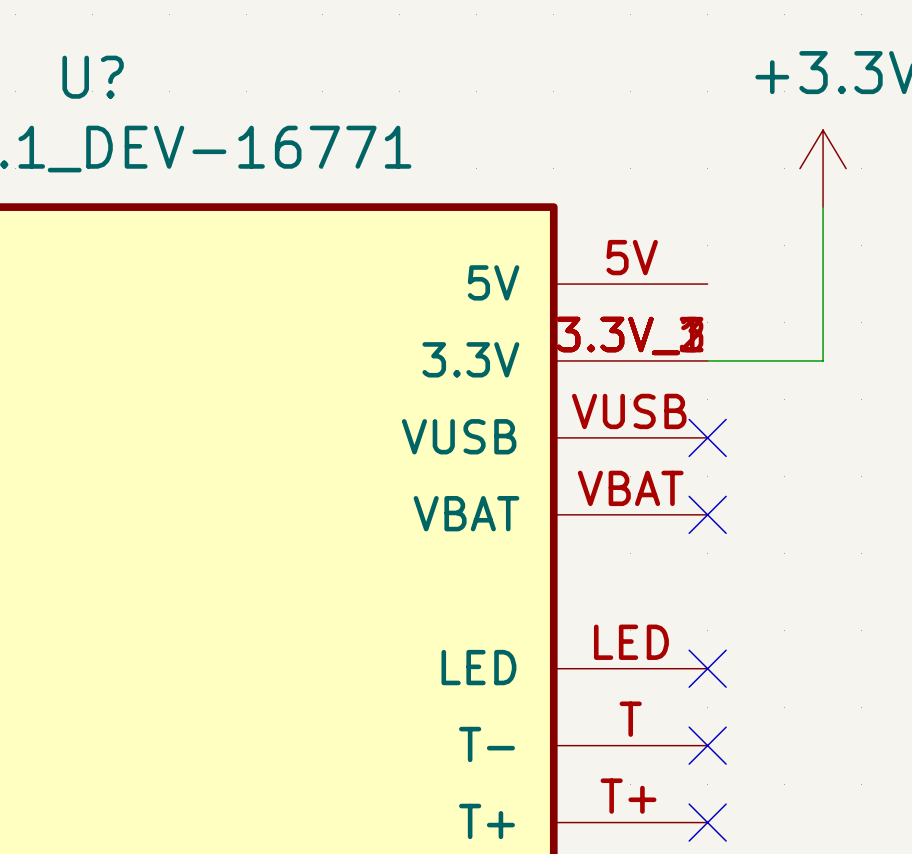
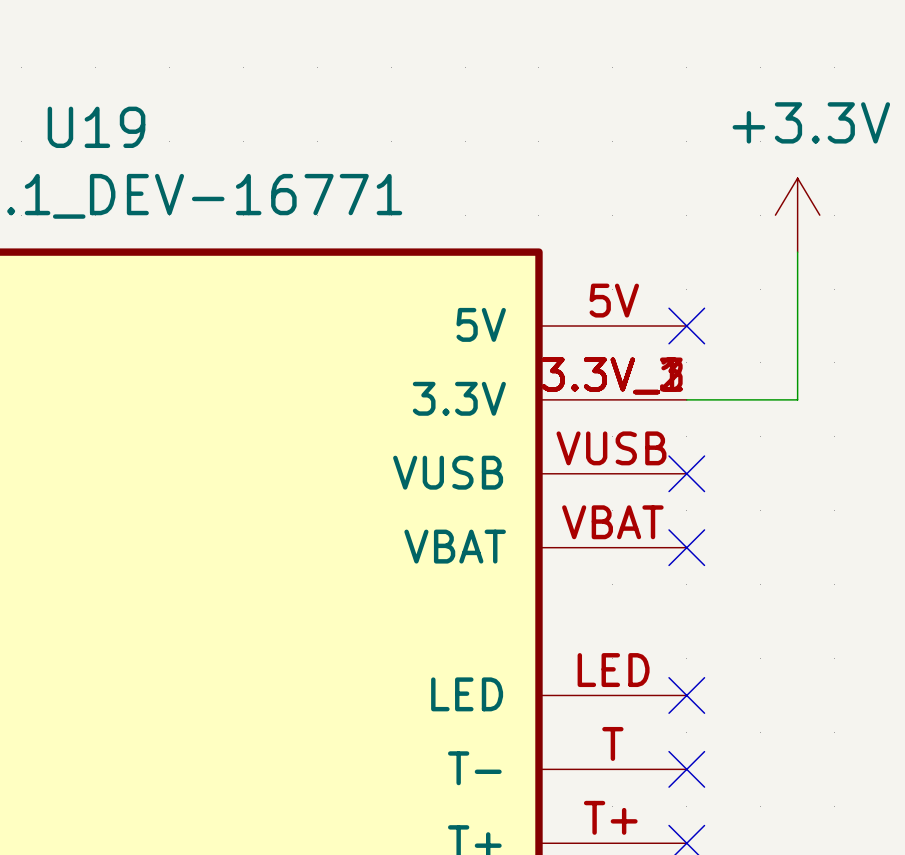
U? name: U? (93, 77) -> U19 (96, 127)
no-connect mark: none -> (686, 326)

